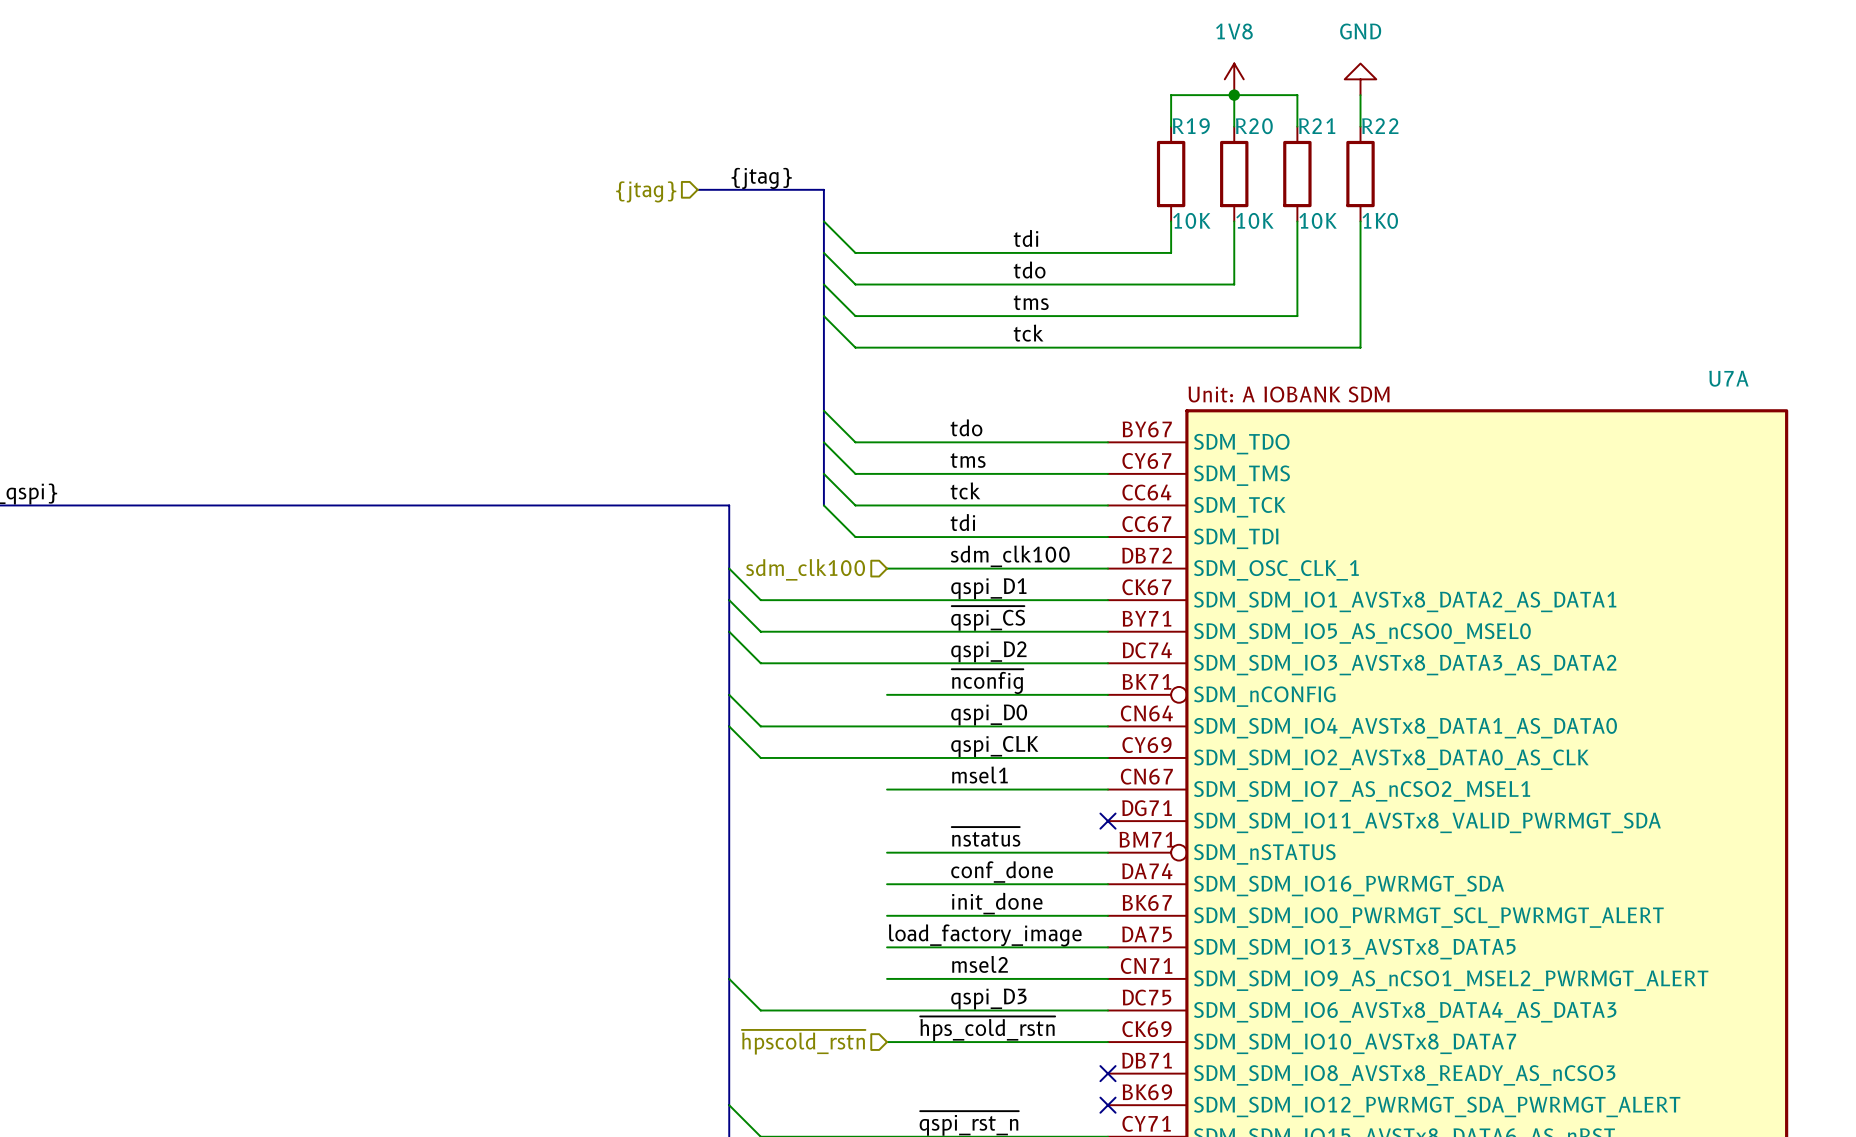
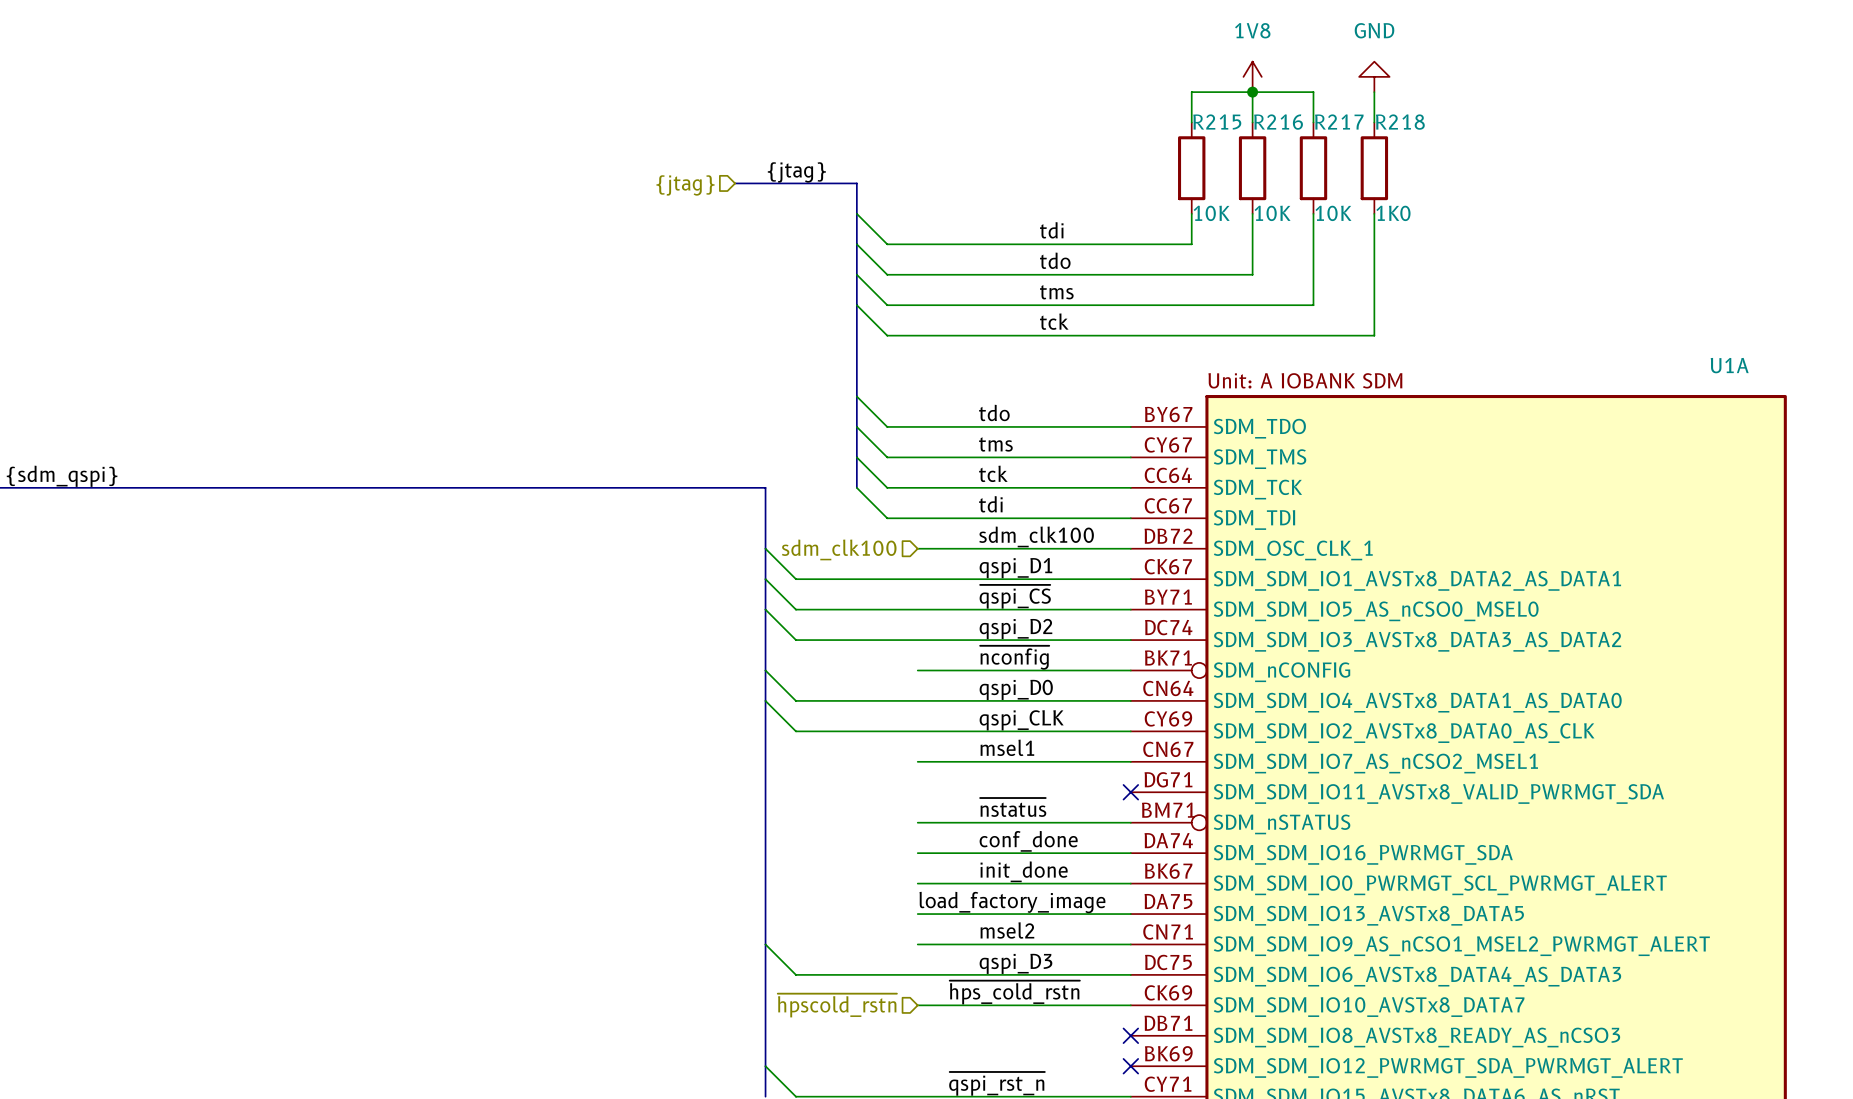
R19 name: R19 (1191, 126) -> R215 (1217, 121)
R20 name: R20 (1254, 126) -> R216 (1278, 122)
R21 name: R21 (1317, 126) -> R217 (1339, 121)
R22 name: R22 (1380, 126) -> R218 (1400, 122)
U7A name: U7A (1728, 378) -> U1A (1729, 365)

